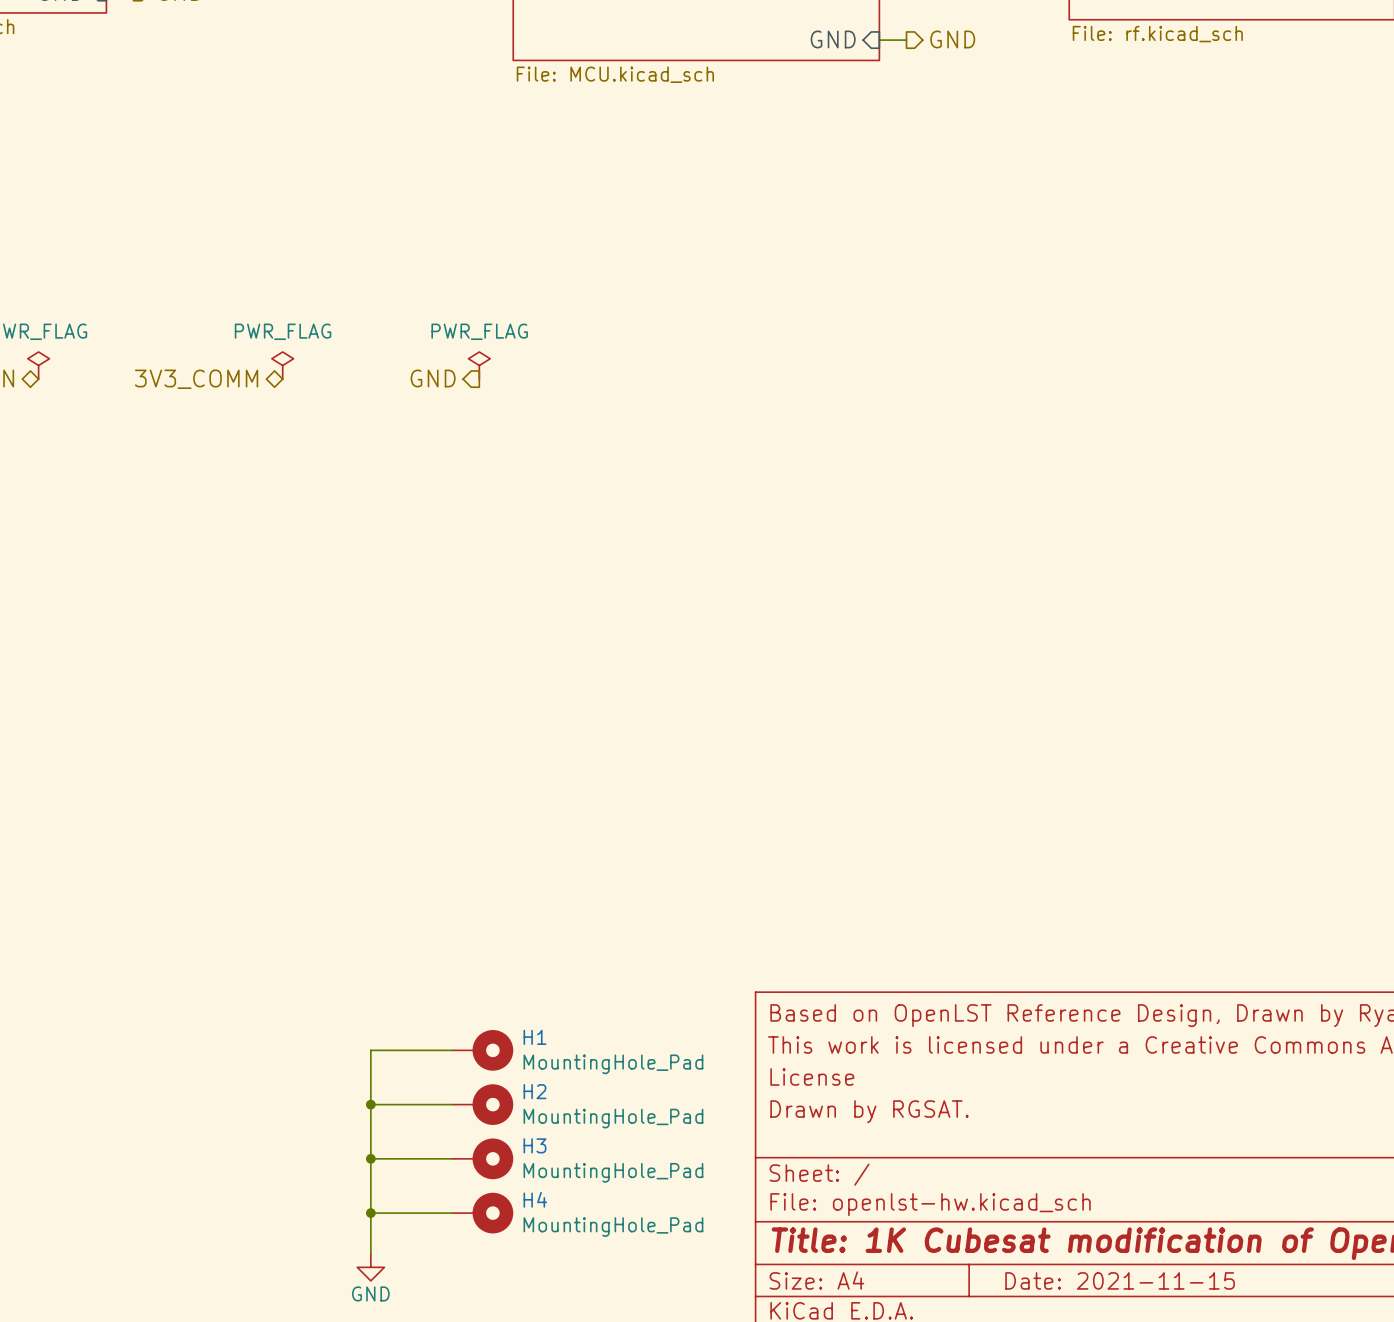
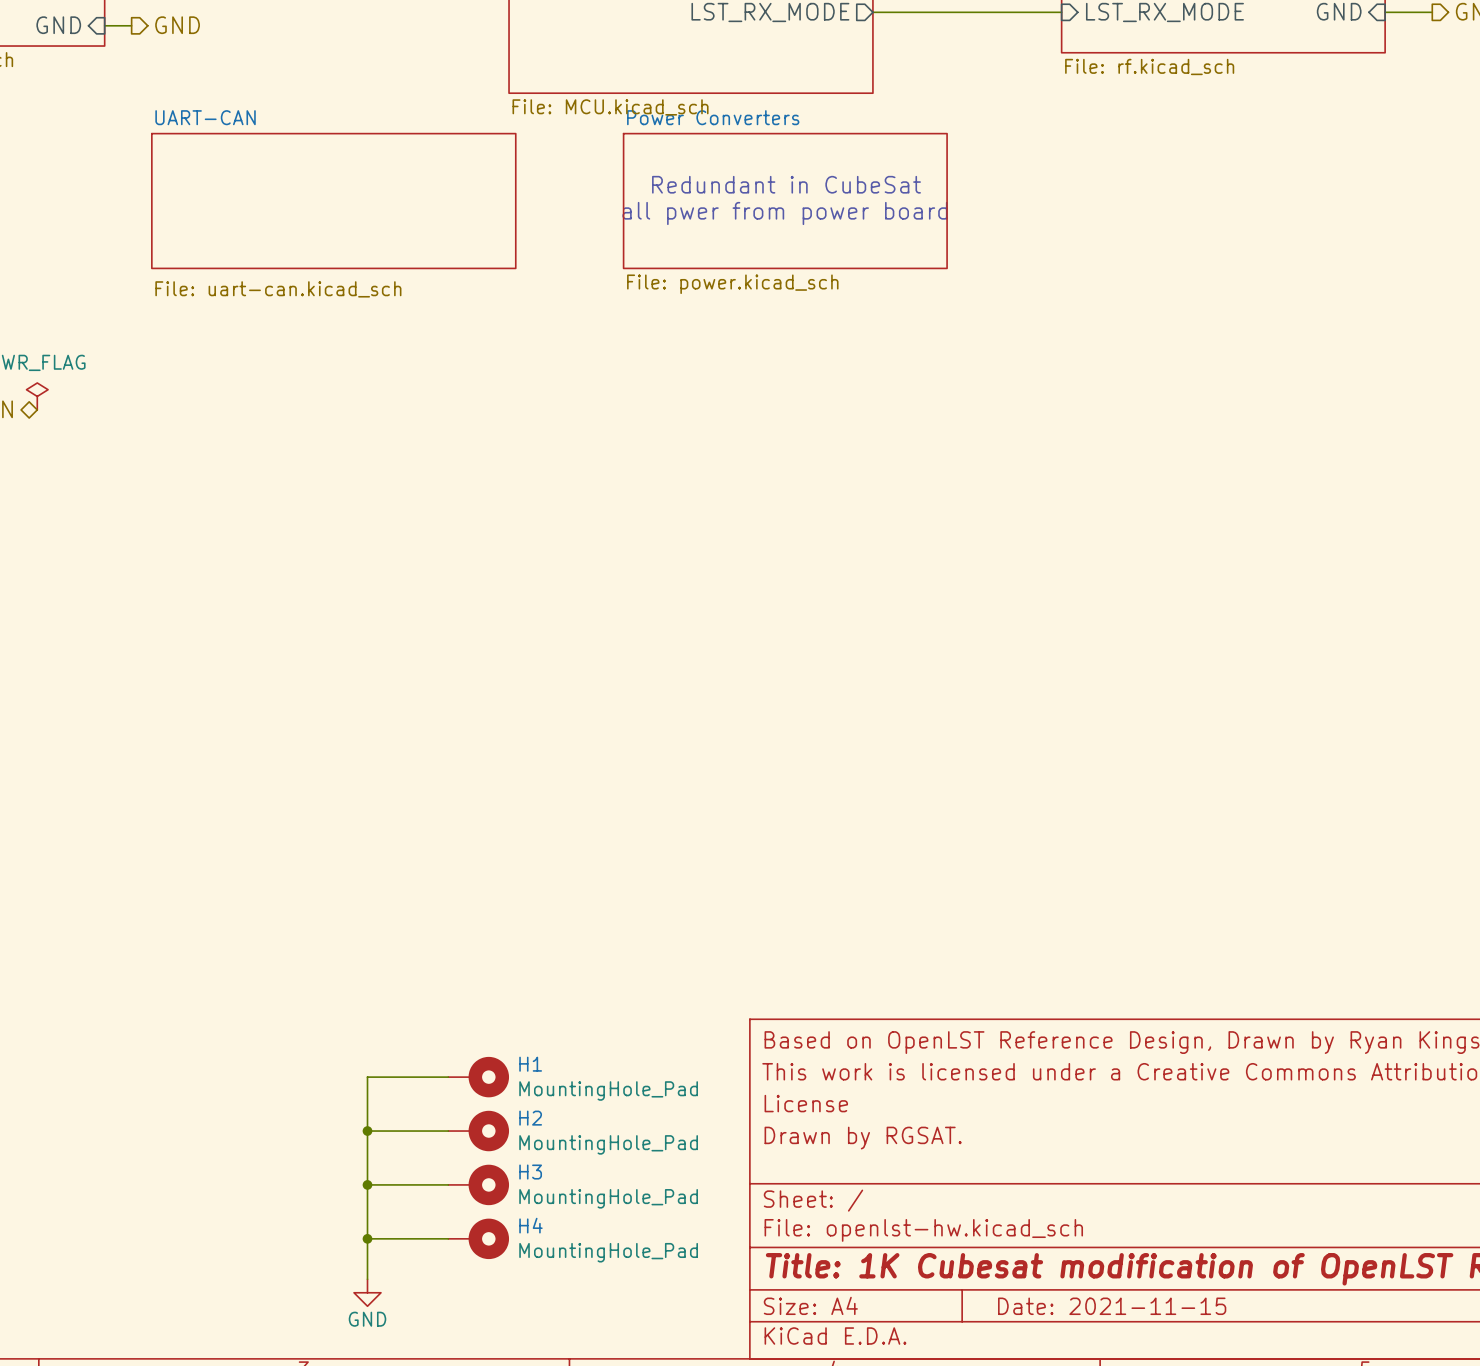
sheet pin: GND (833, 39) -> none
hierarchical label: GND (952, 39) -> none
wire: (879, 40) (906, 40) -> none
text: none -> Redundant in CubeSat (786, 184)
sheet UART-CAN: none -> File: uart-can.kicad_sch (333, 201)
sheet Power Converters: none -> File: power.kicad_sch (785, 201)
text: none -> all pwer from power board (784, 213)
power symbol: PWR_FLAG (282, 365) -> none
power symbol: PWR_FLAG (479, 365) -> none
hierarchical label: GND (433, 378) -> none
hierarchical label: 3V3_COMM (196, 379) -> none

